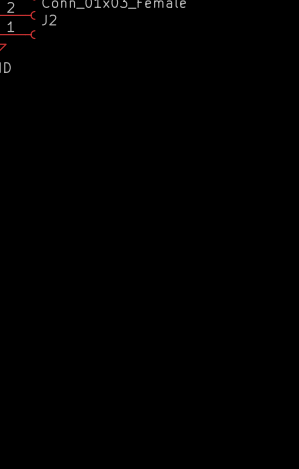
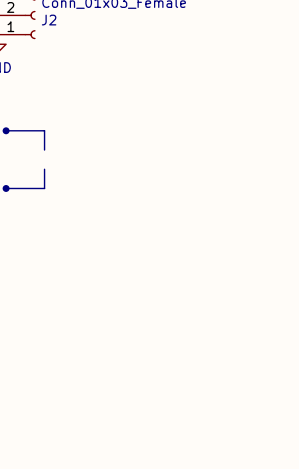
wire: none -> (6, 130) (44, 130) (44, 150)
junction: none -> (6, 130)
wire: none -> (44, 169) (44, 188) (6, 188)
junction: none -> (6, 188)

